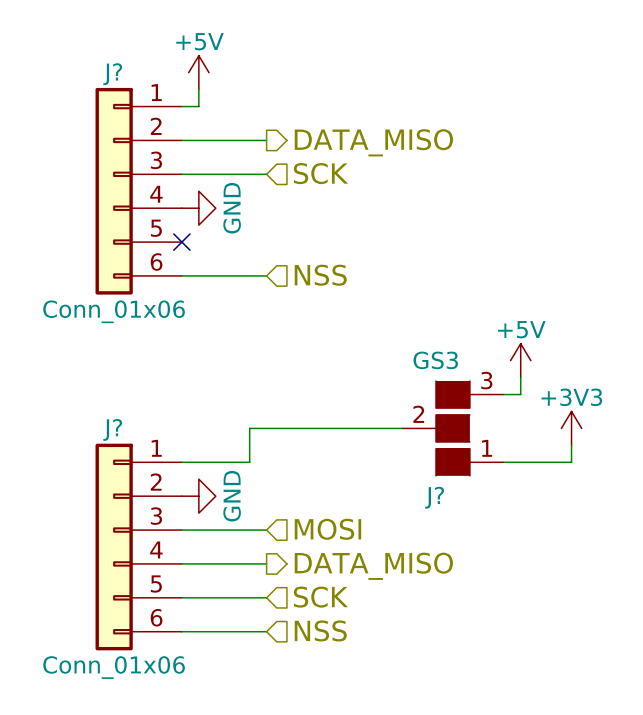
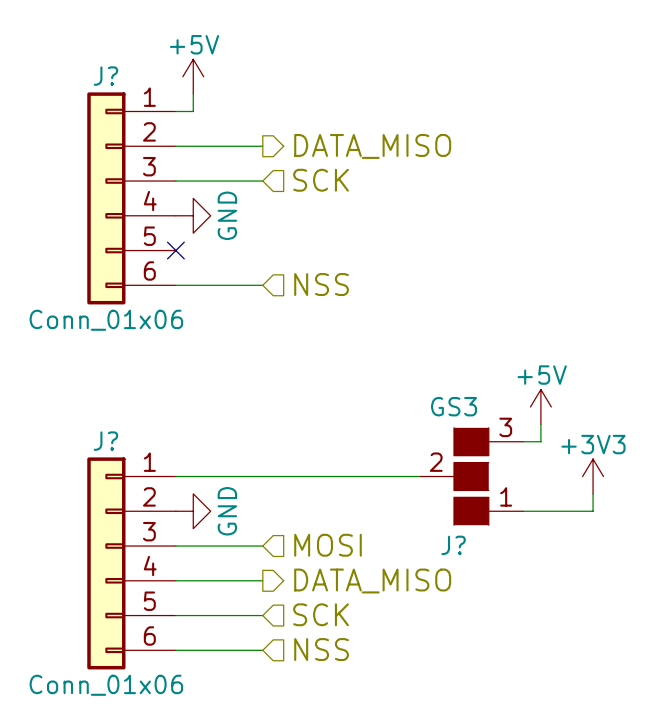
power symbol position: +5V (520, 360) -> +5V (540, 406)
wire: (520, 377) (520, 394) (503, 394) -> (540, 424) (540, 441) (523, 441)
wire: (402, 428) (249, 428) (249, 462) -> (419, 476) (245, 476)
J? position: (452, 428) -> (471, 476)
power symbol position: +3V3 (571, 428) -> +3V3 (593, 476)
wire: (571, 445) (571, 462) (503, 462) -> (593, 493) (593, 511) (523, 511)

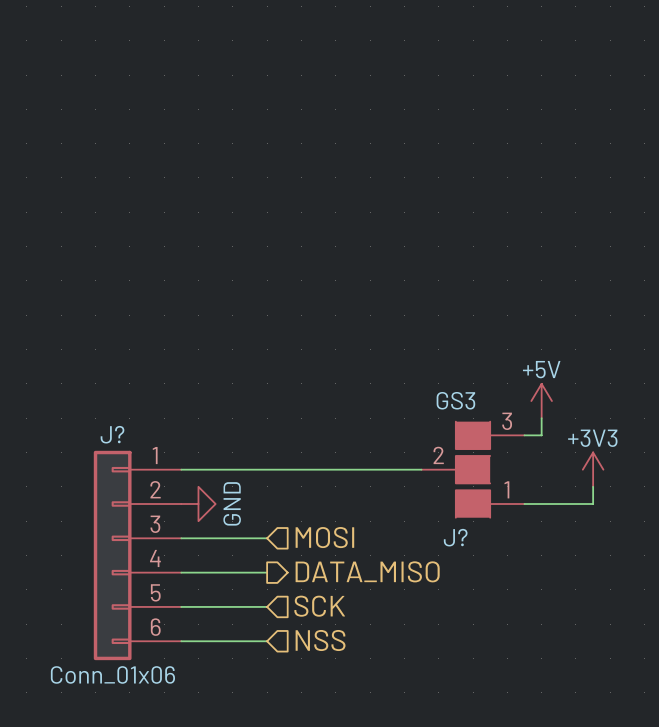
power symbol: +5V (193, 76) -> none
wire: (193, 94) (193, 111) (175, 111) -> none
wire: (175, 146) (262, 146) -> none
hierarchical label: DATA_MISO (372, 146) -> none
hierarchical label: SCK (321, 180) -> none
wire: (175, 181) (262, 181) -> none
J?: Conn_01x06 (131, 198) -> none
power symbol: GND (193, 215) -> none
no-connect mark: (175, 250) -> none
hierarchical label: NSS (321, 284) -> none
wire: (175, 285) (262, 285) -> none

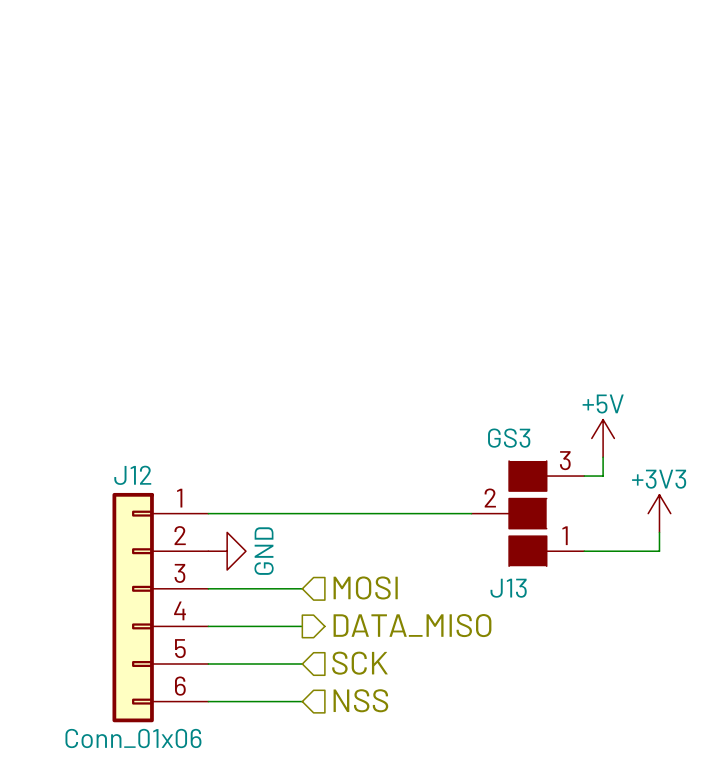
J? name: J? (112, 434) -> J12 (132, 475)
J? name: J? (455, 537) -> J13 (508, 588)

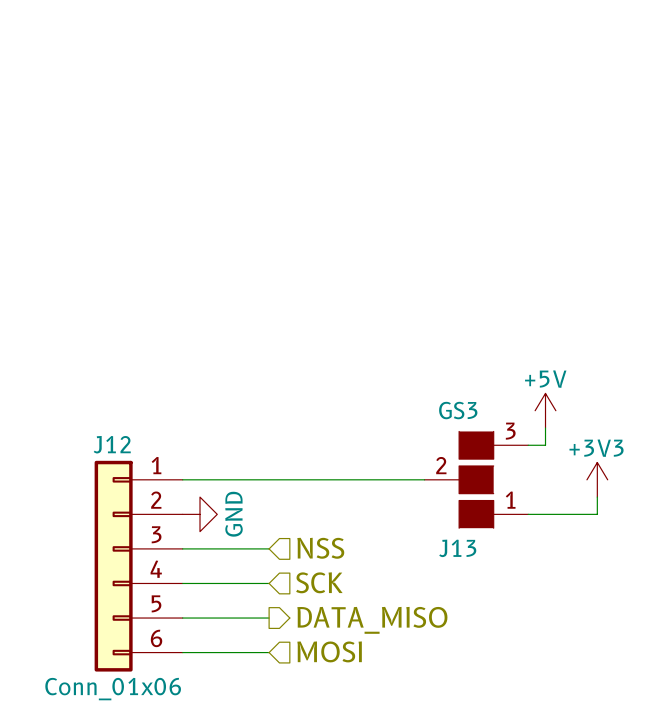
hierarchical label: MOSI (365, 587) -> NSS (320, 548)
hierarchical label shape: output (412, 625) -> input (319, 582)
hierarchical label: DATA_MISO (412, 625) -> SCK (319, 582)
hierarchical label shape: input (359, 663) -> output (372, 620)
hierarchical label: SCK (359, 663) -> DATA_MISO (372, 620)
hierarchical label: NSS (360, 700) -> MOSI (329, 651)

